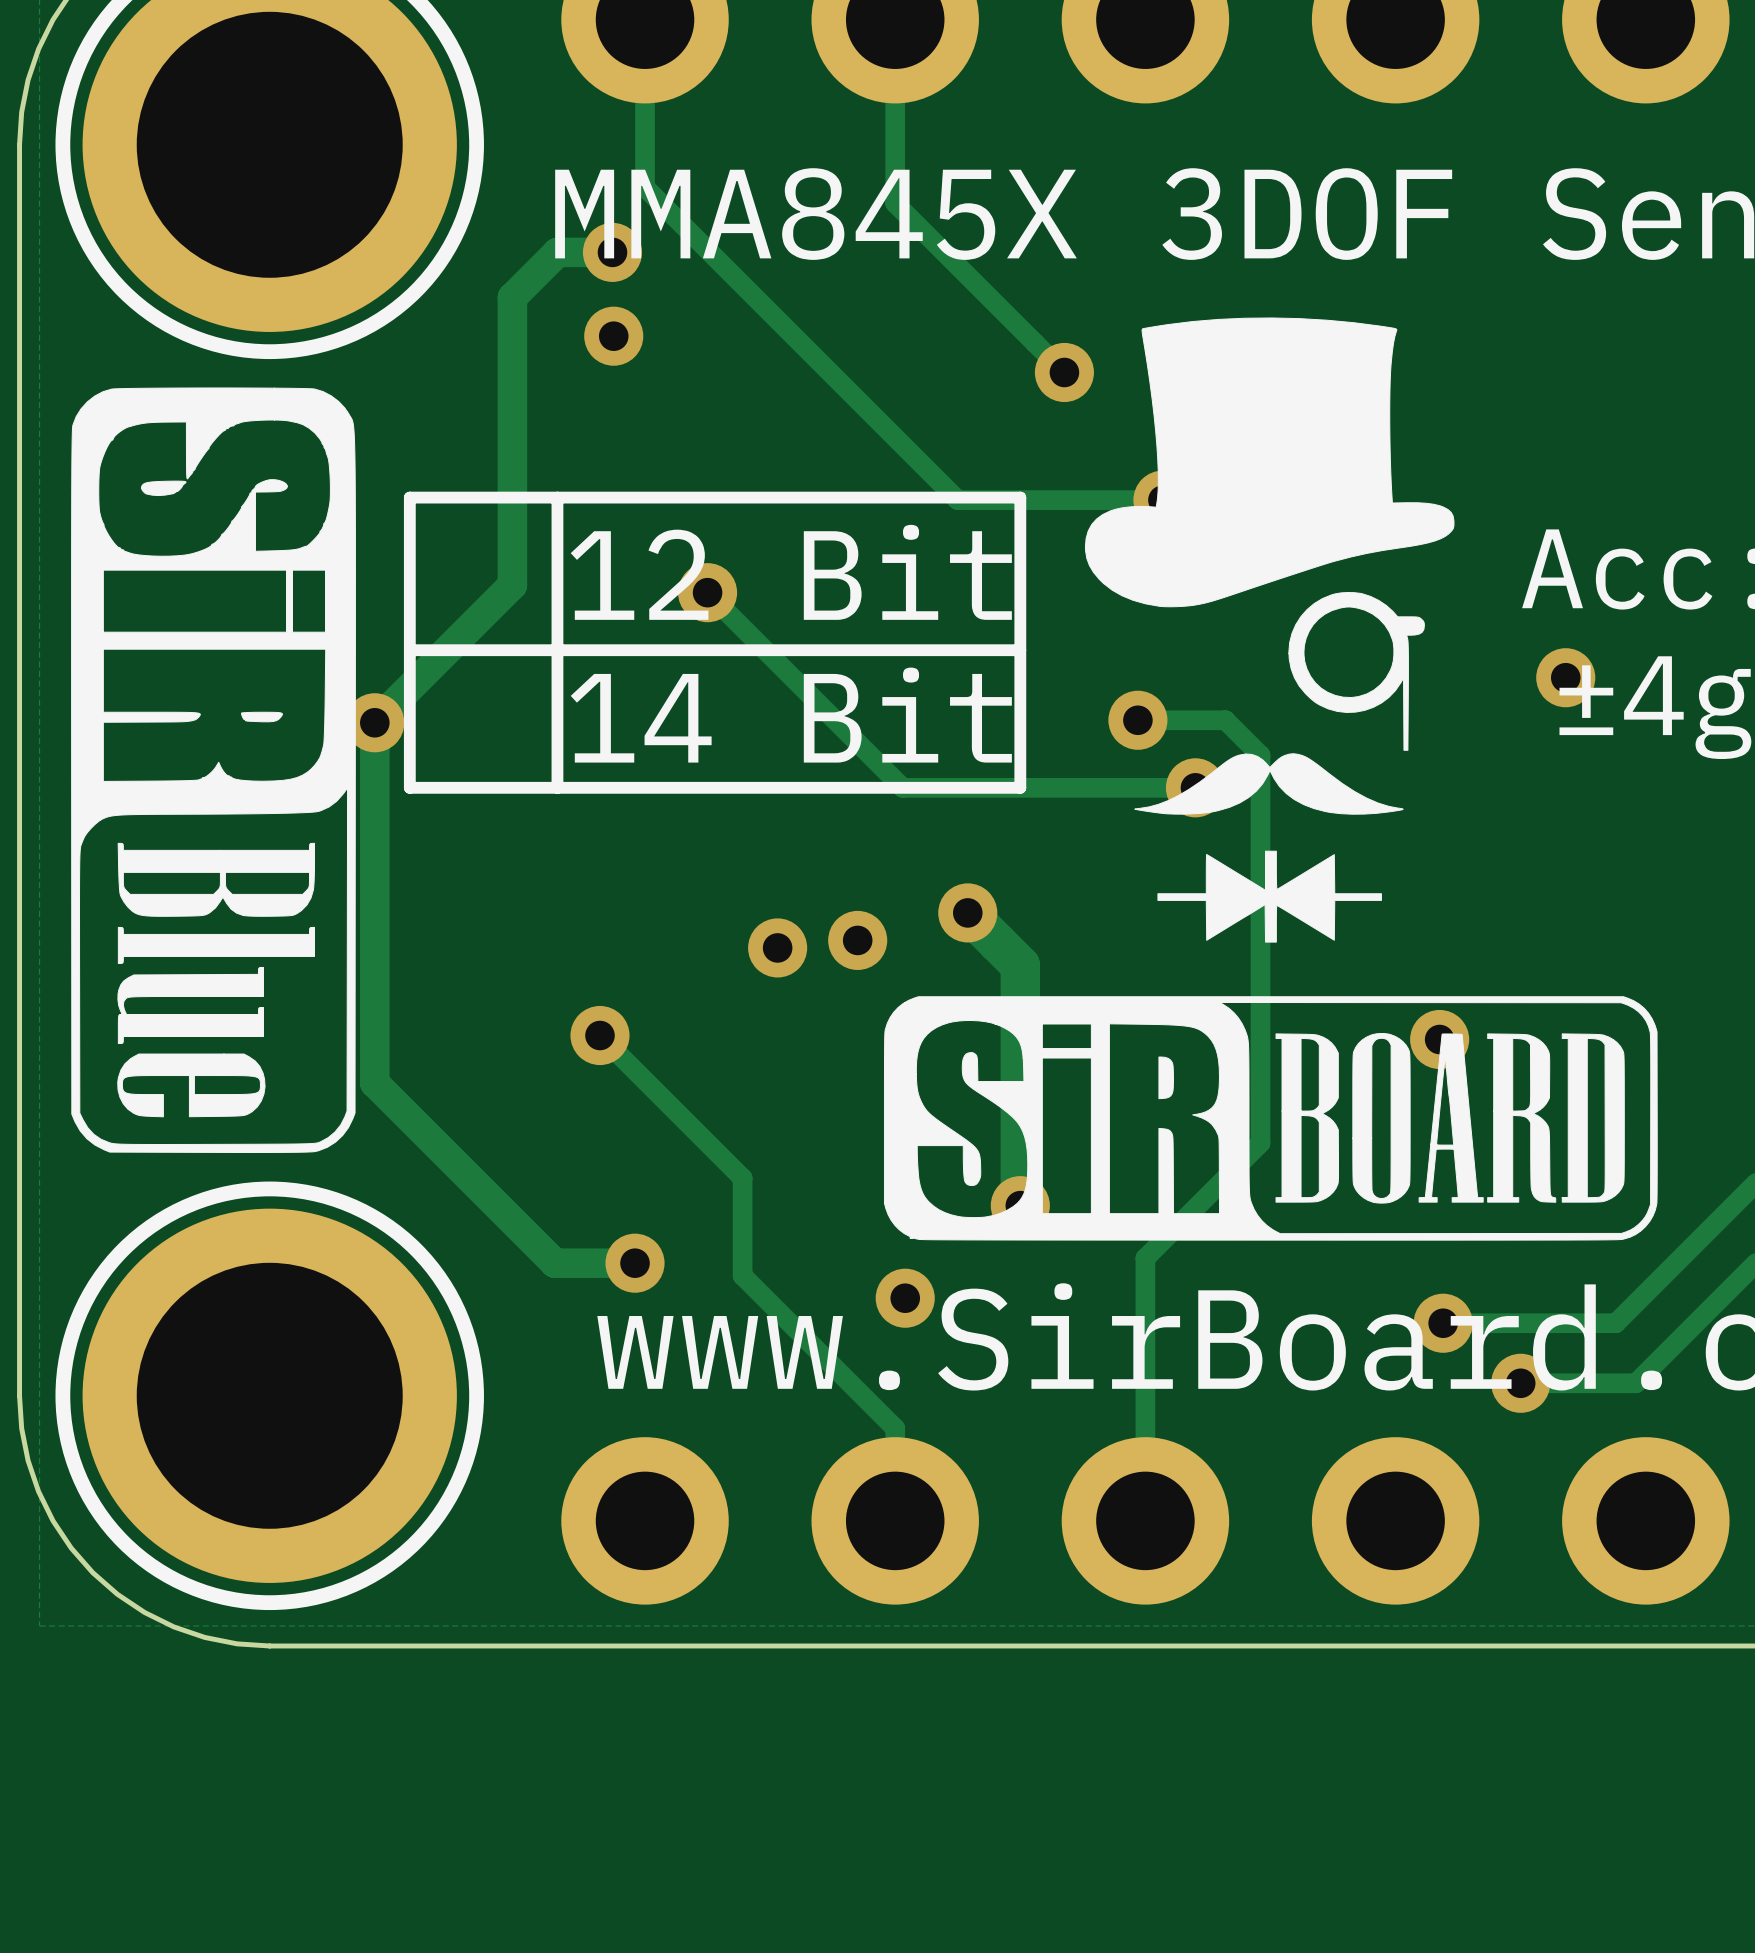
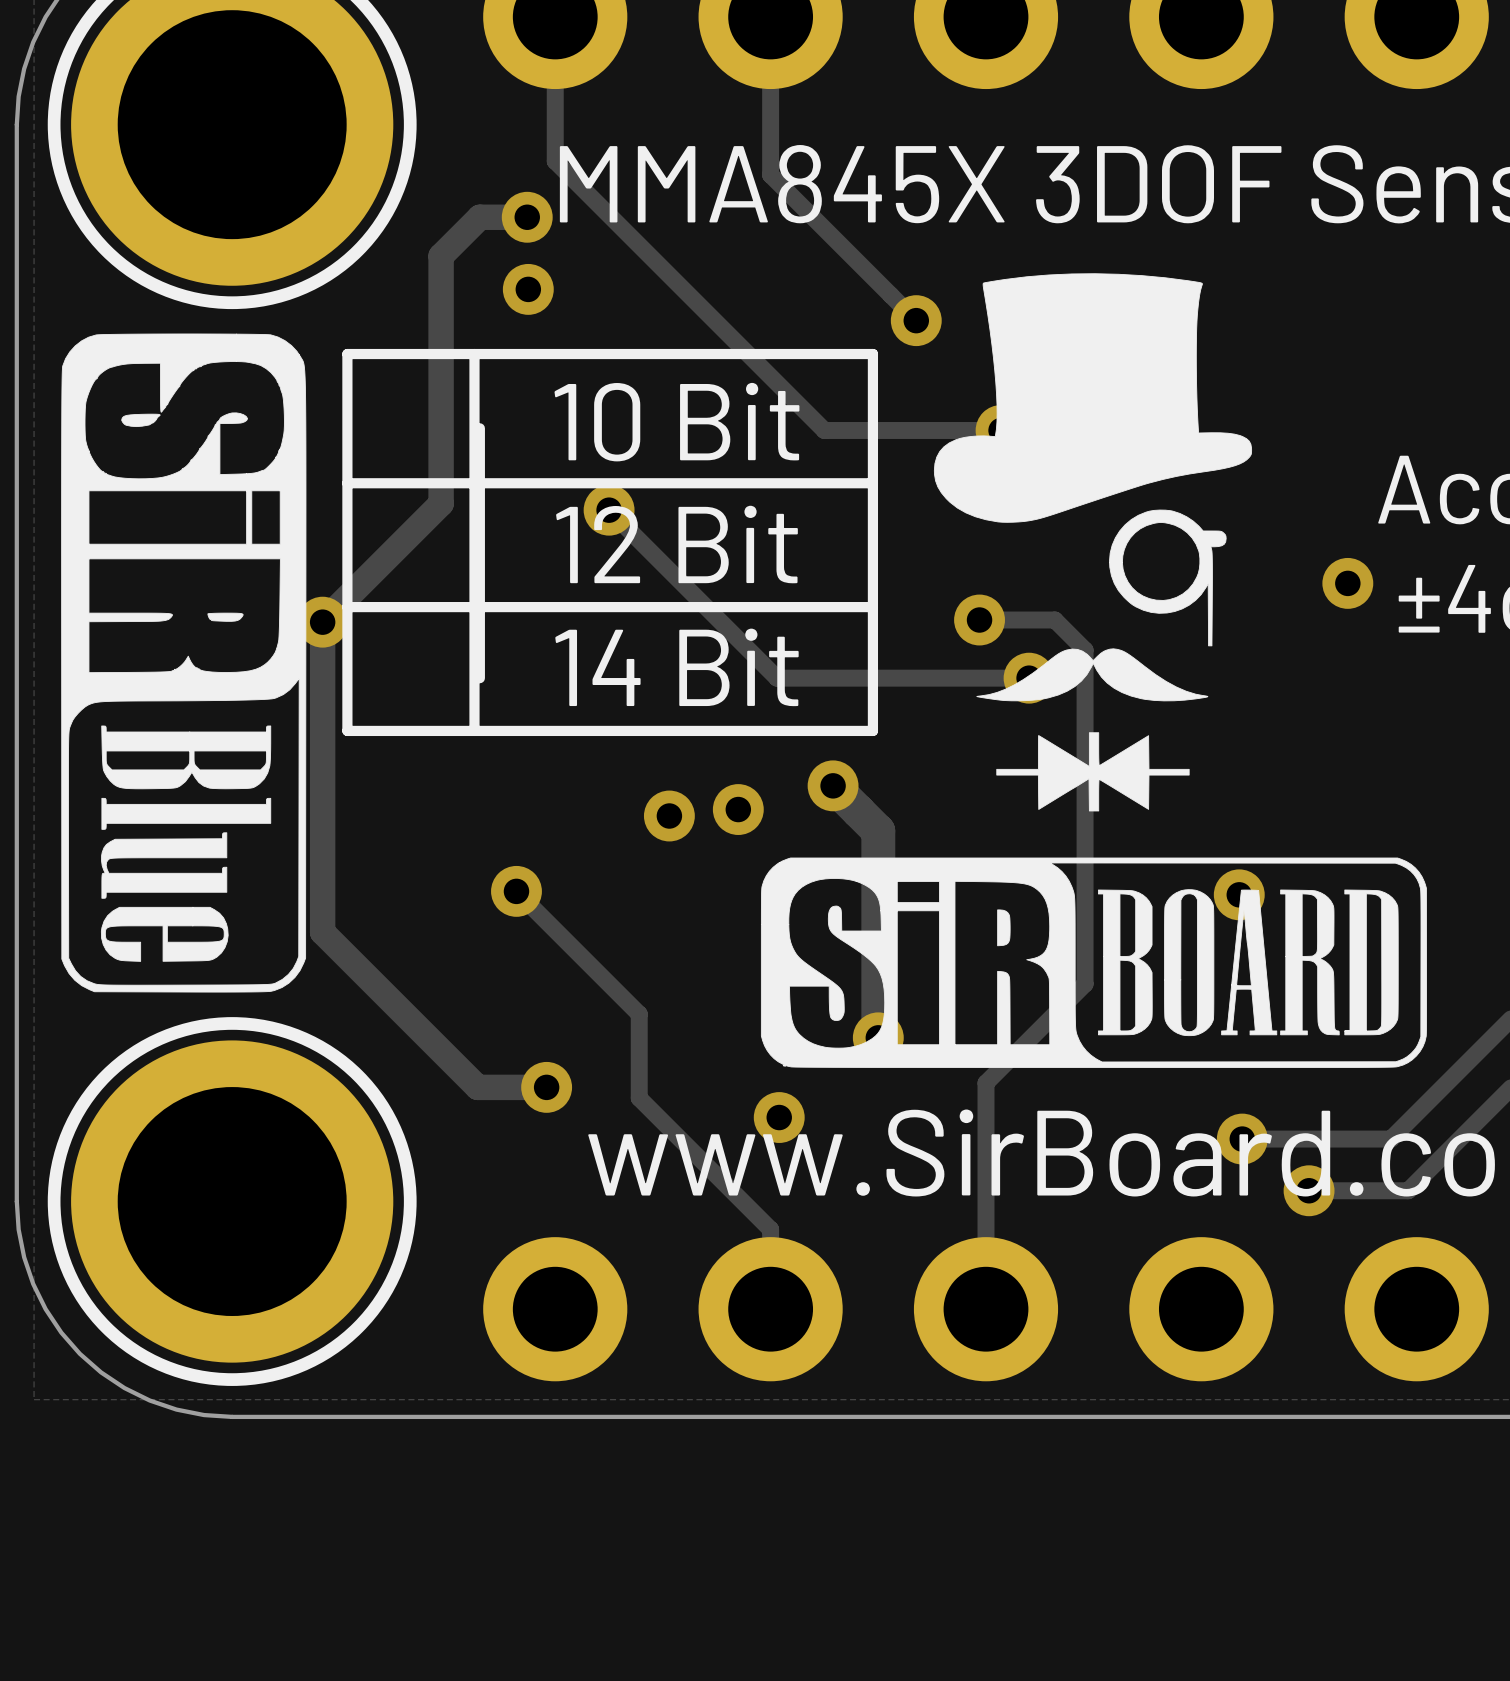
line: none -> (474, 354) (474, 730)
text: none -> 10 Bit (676, 422)
line: (1020, 497) (409, 497) (409, 787) (1020, 787) (1020, 497) -> (872, 354) (872, 730) (347, 730) (347, 354) (872, 354)
line: none -> (872, 483) (347, 483)
text position: 12 Bit (791, 572) -> 12 Bit (676, 544)
line: (1020, 650) (409, 650) -> (872, 607) (347, 607)
text position: 14 Bit (791, 715) -> 14 Bit (676, 667)

